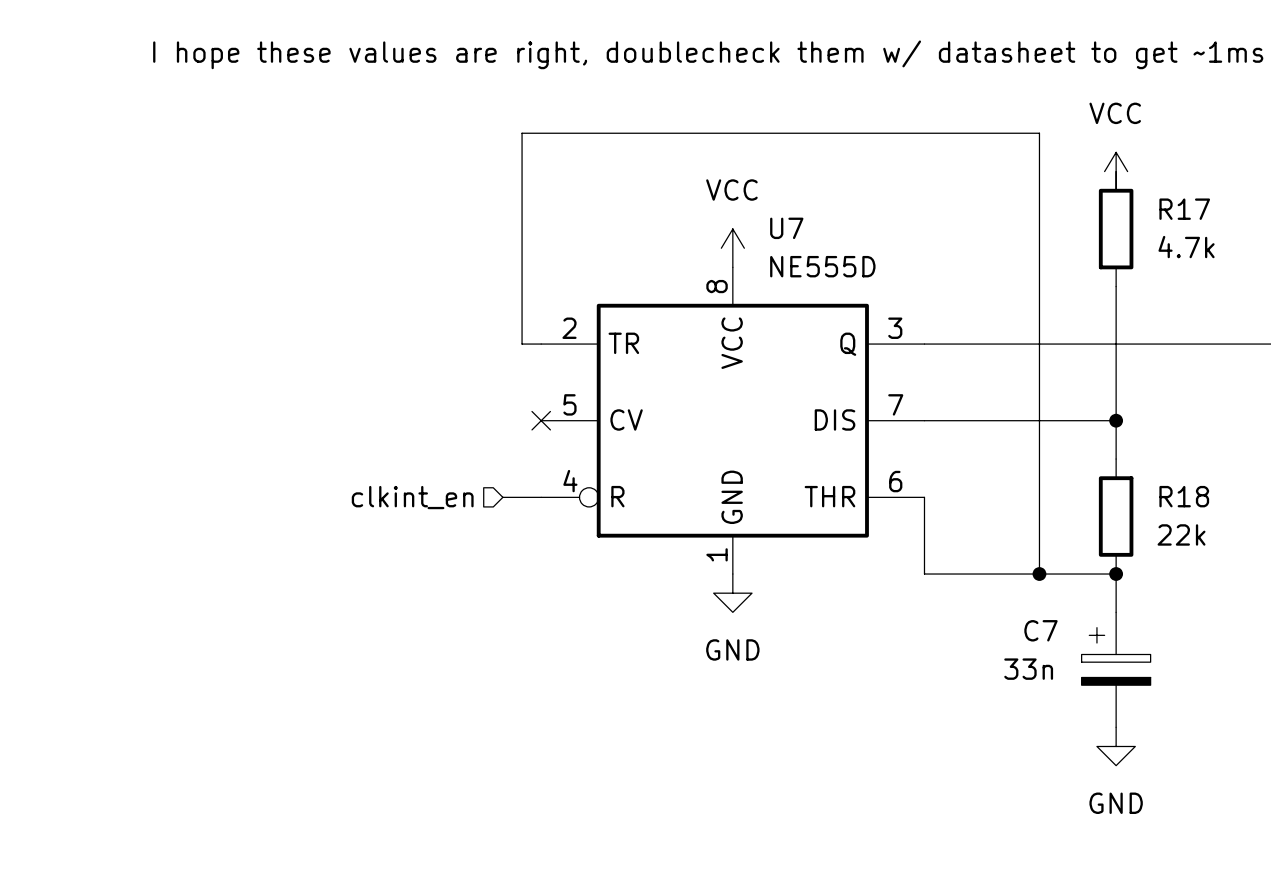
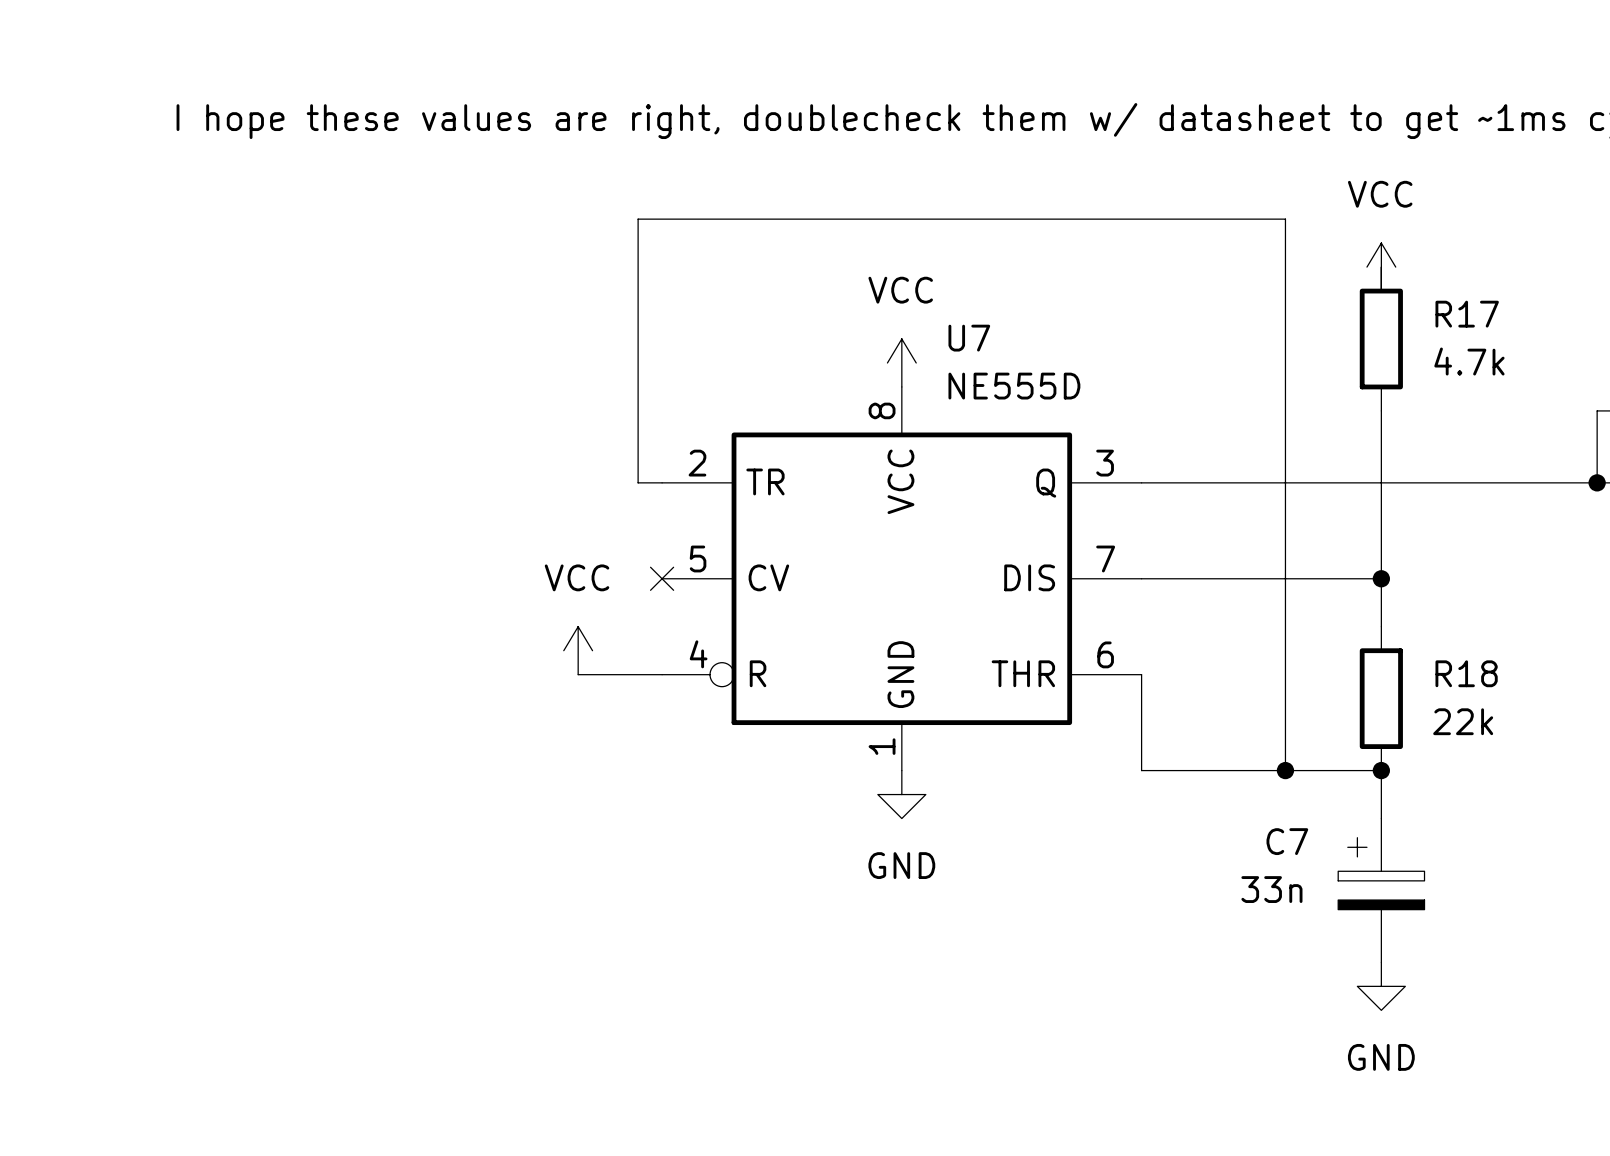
power symbol: none -> VCC (578, 650)
hierarchical label: clkint_en (412, 497) -> none
wire: none -> (578, 674) (614, 674)

